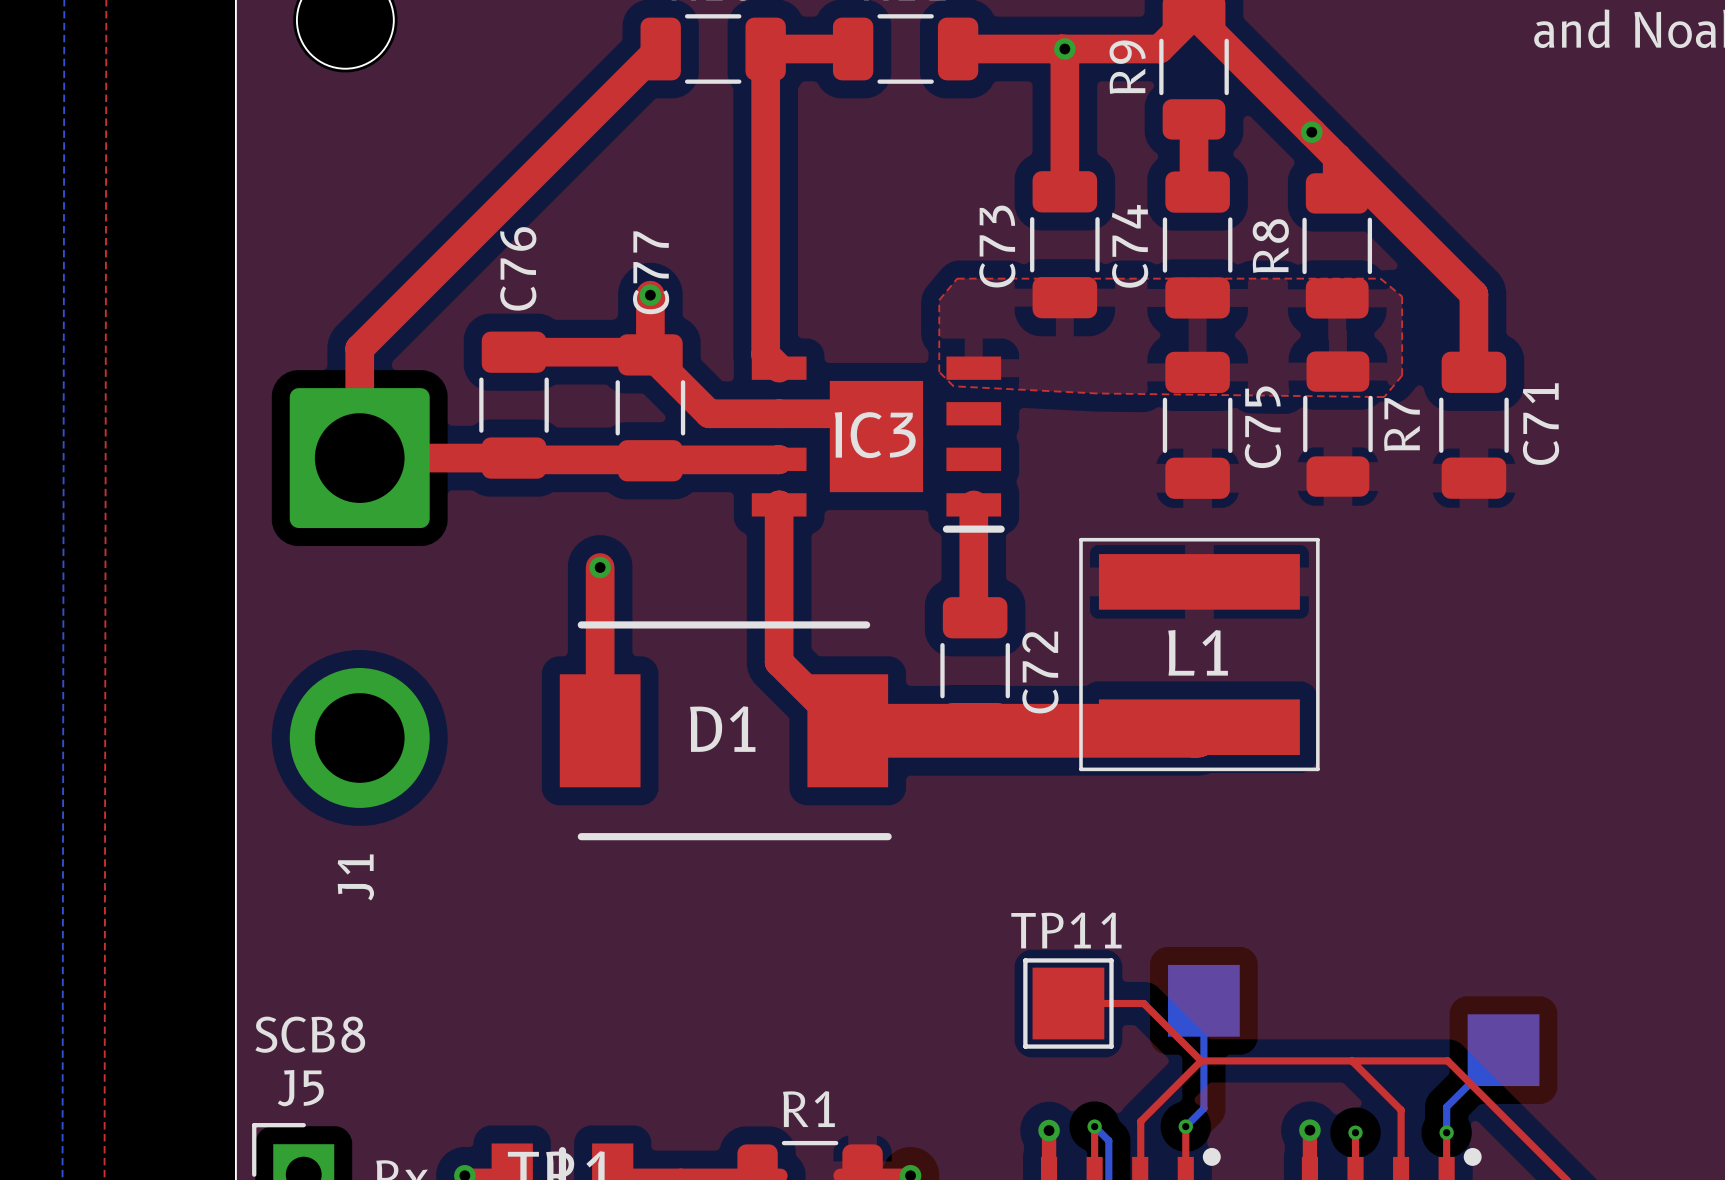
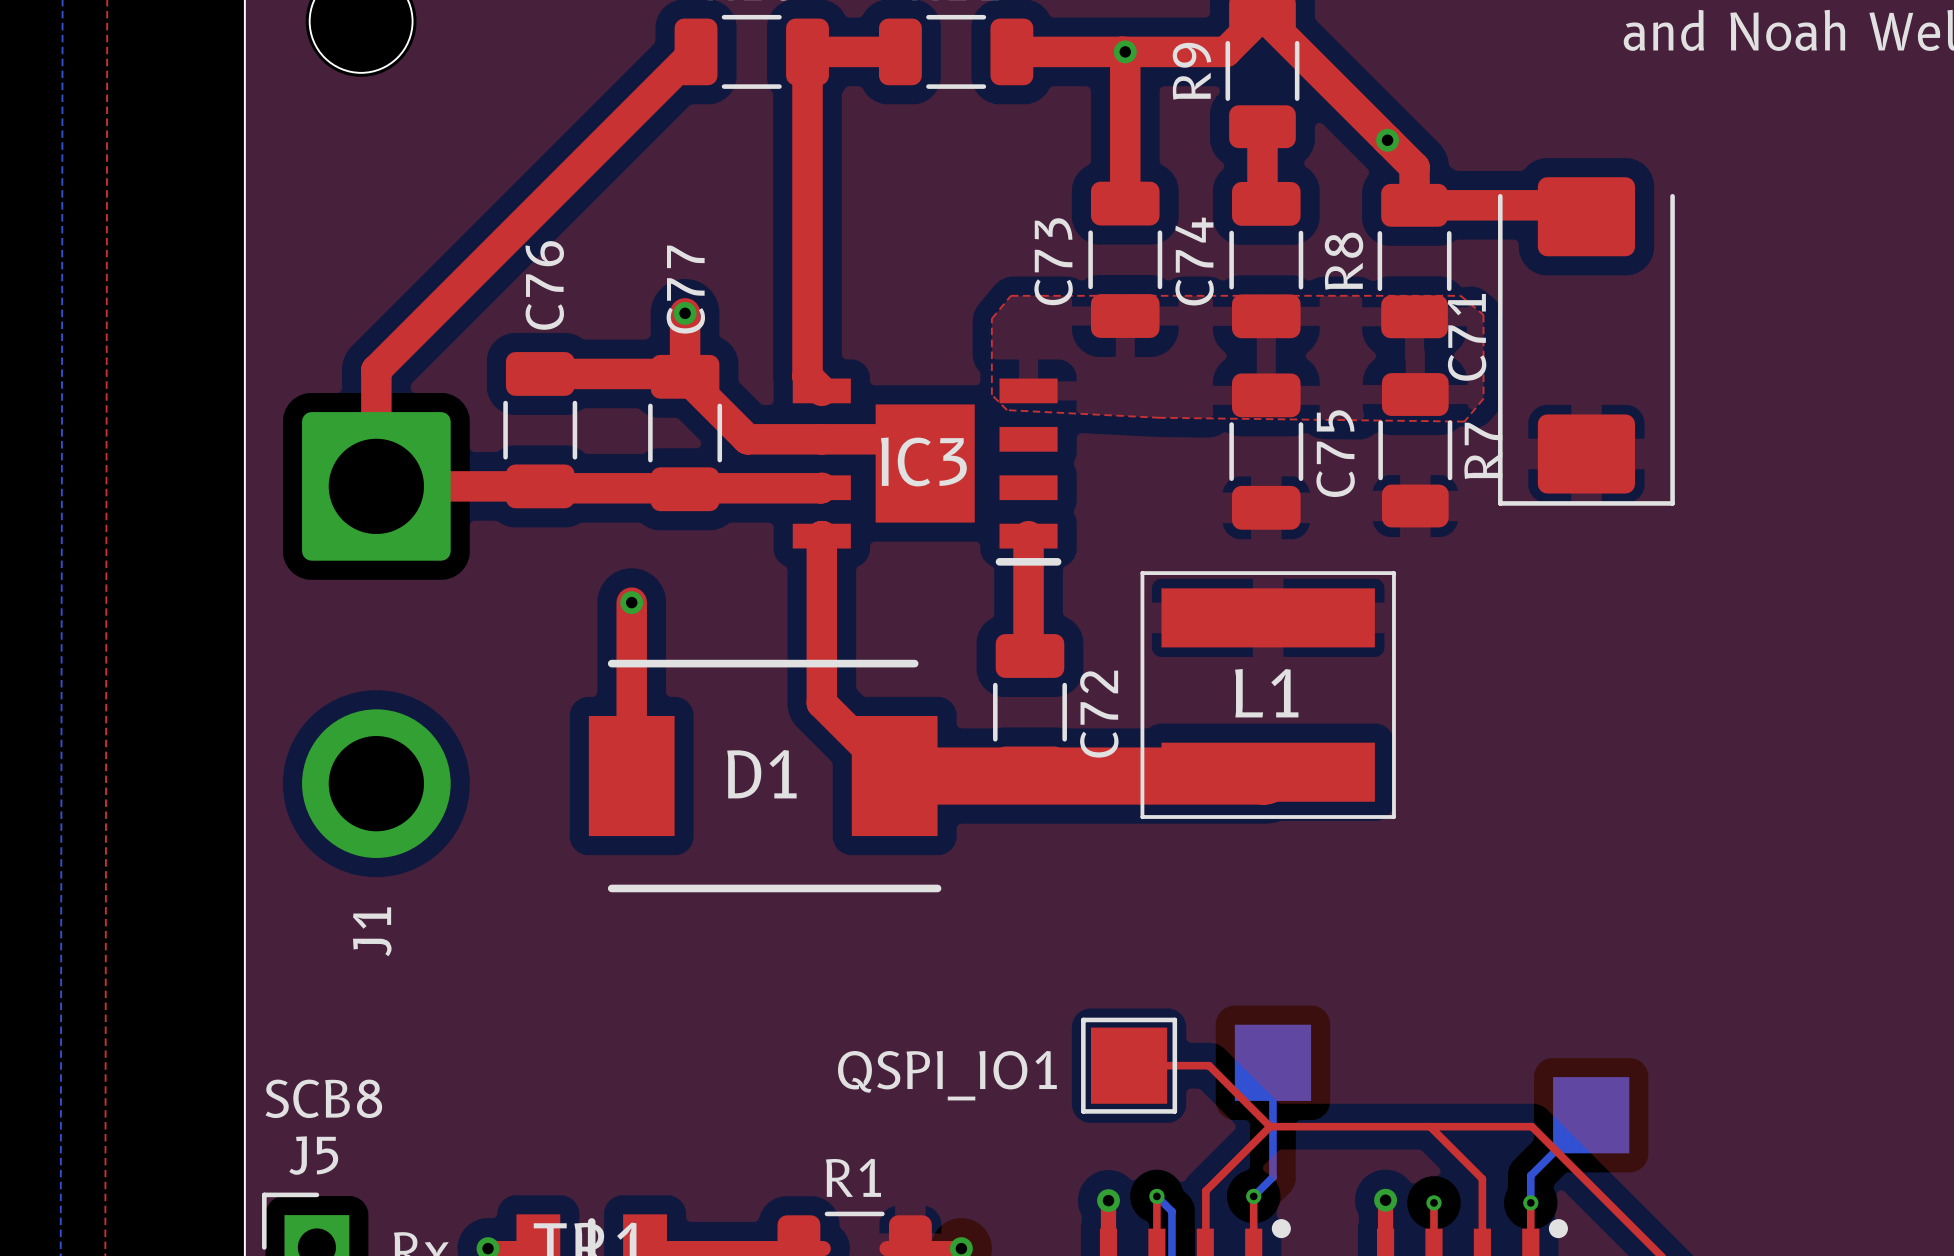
top track: (1337, 157) (1473, 294) (1473, 372) -> none
top track: none -> (1414, 205) (1557, 205) (1587, 235)
C71 footprint: [1439, 351, 1509, 499] -> [1498, 177, 1675, 506]
C71 name position: C71 (1540, 424) -> C71 (1467, 337)
TP11 name: TP11 (1066, 930) -> QSPI_IO1 (947, 1075)

